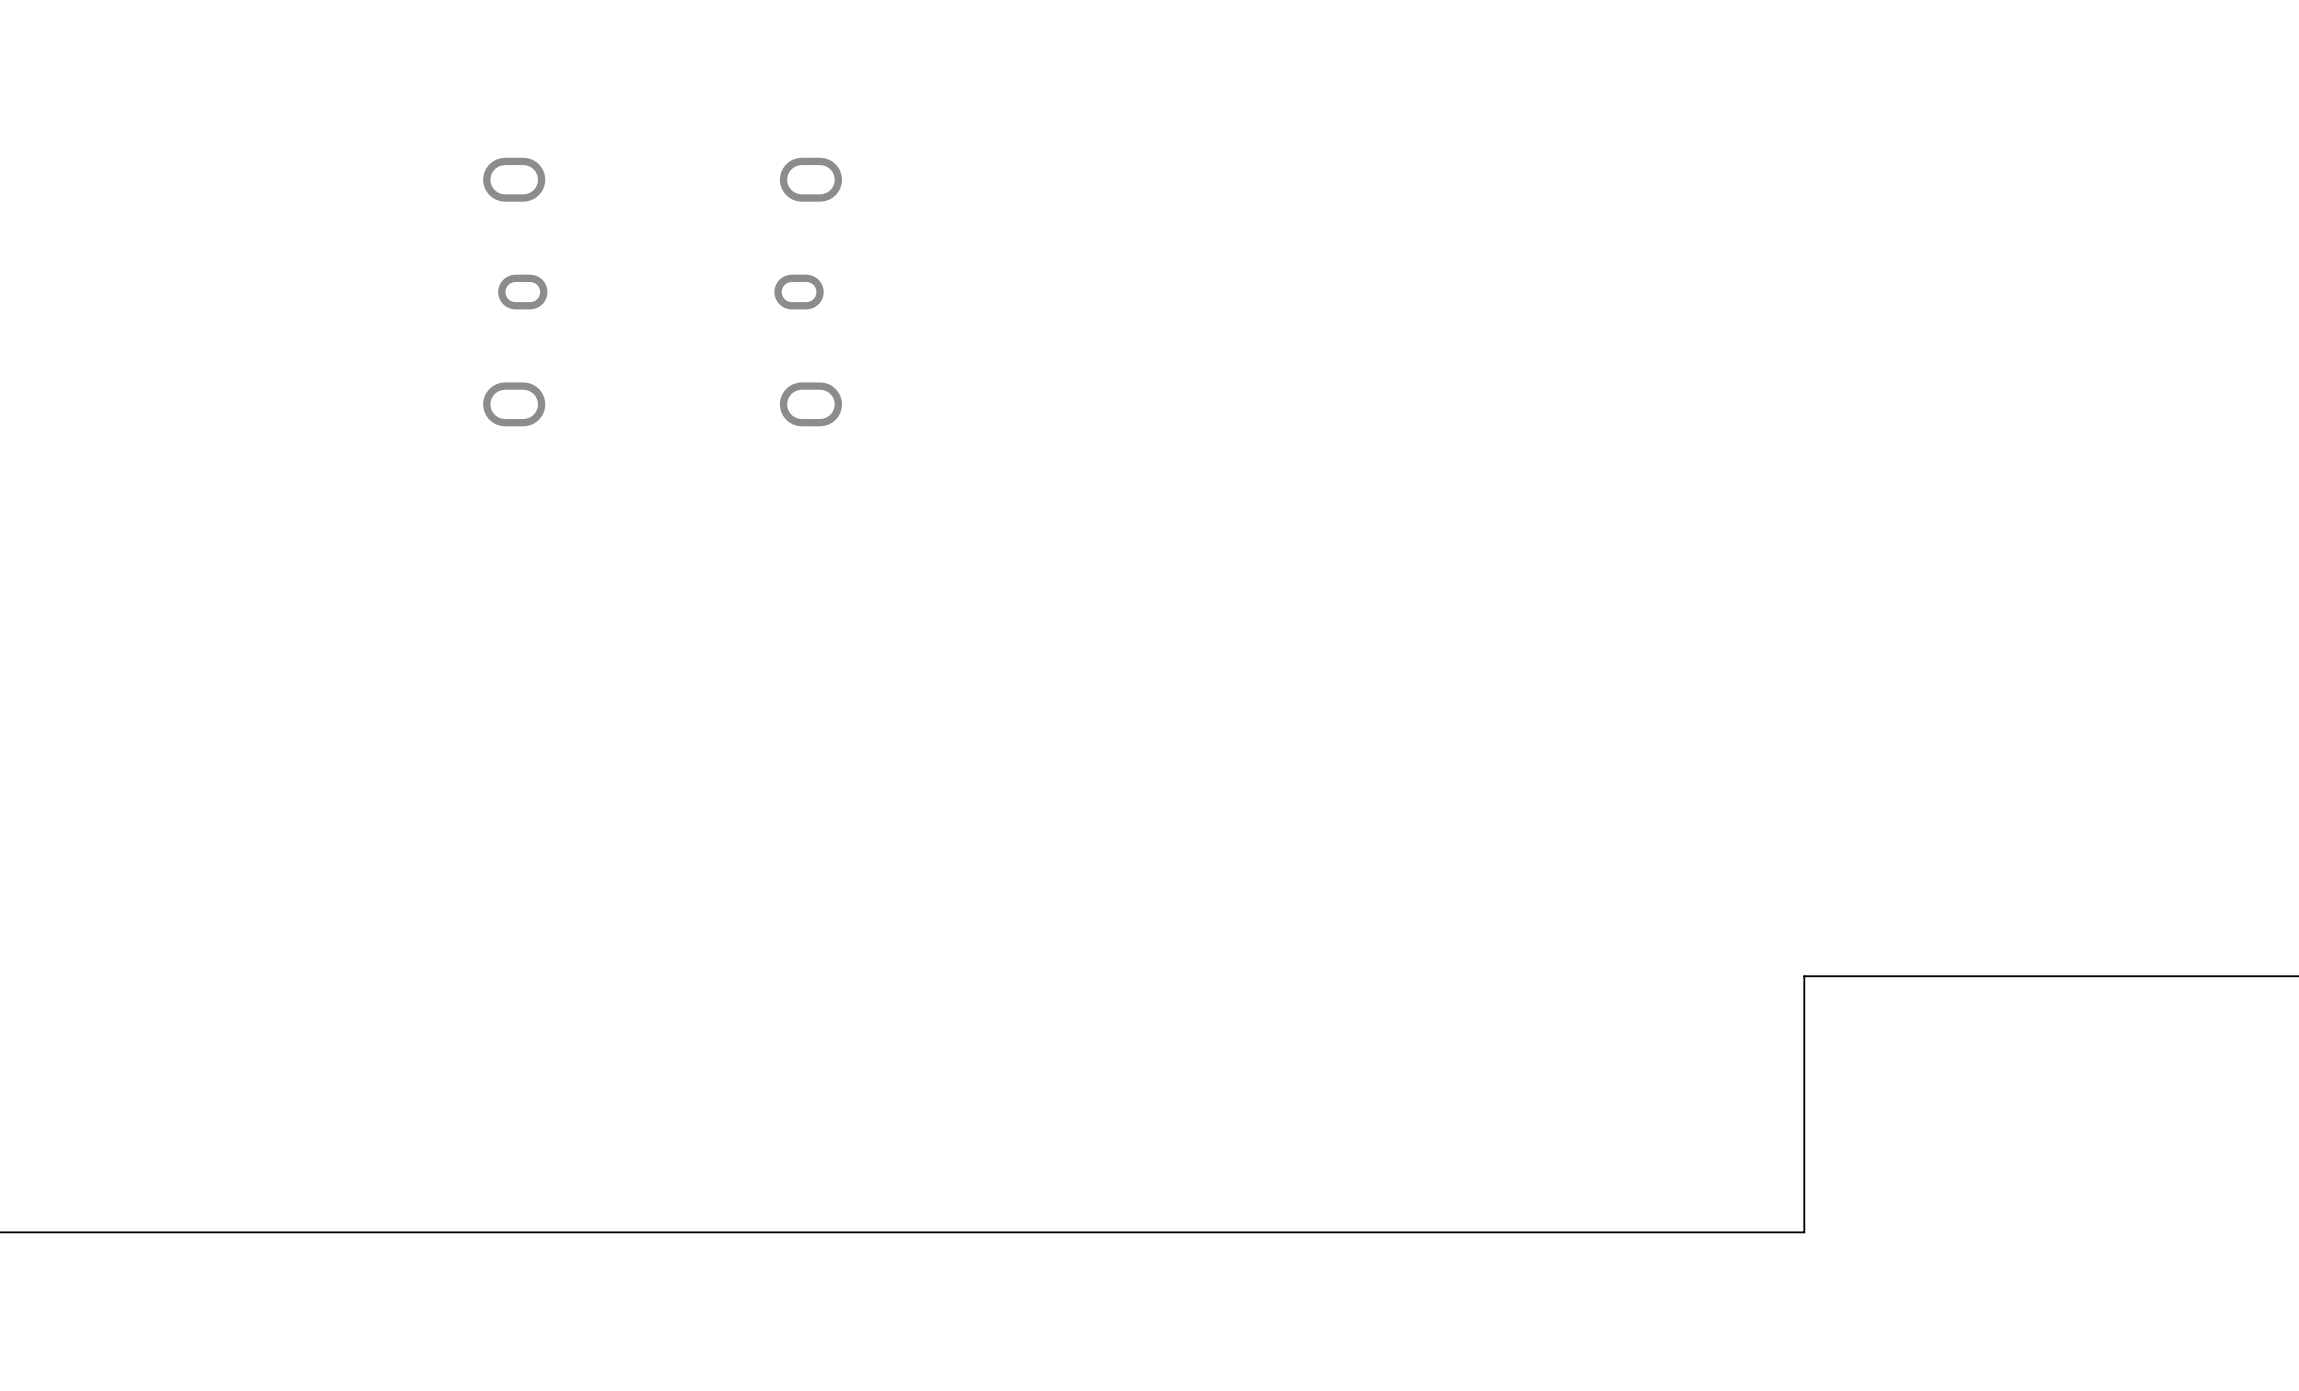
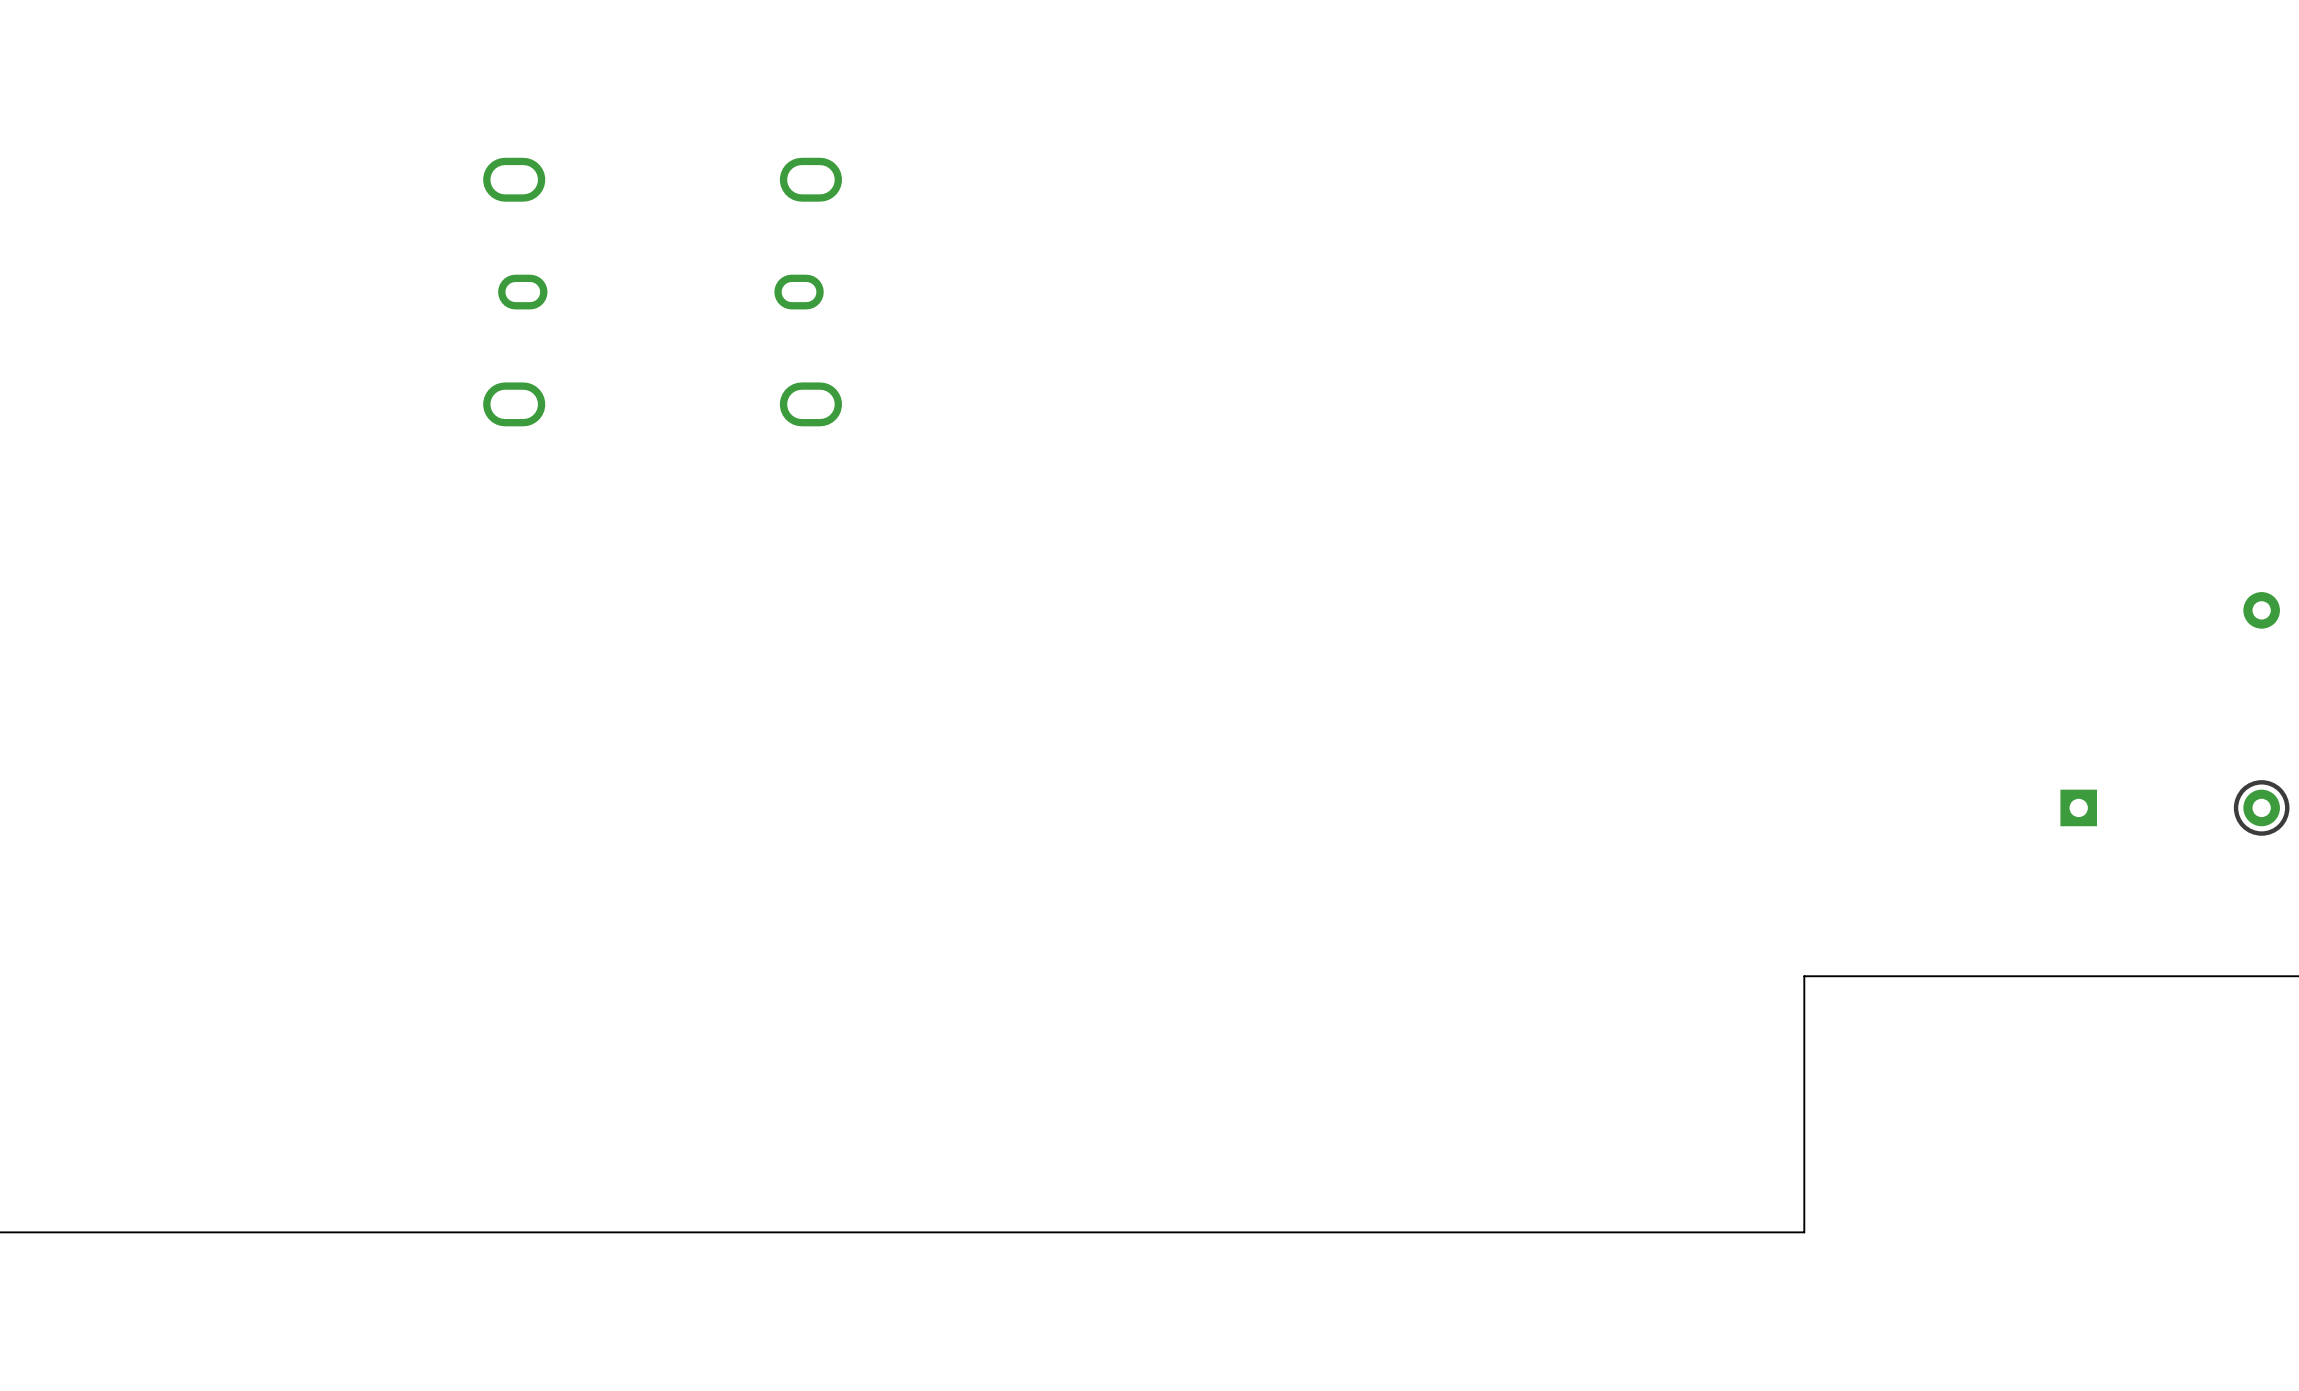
part: none -> (2261, 610)
part: none -> (2078, 807)
part: none -> (2261, 807)

